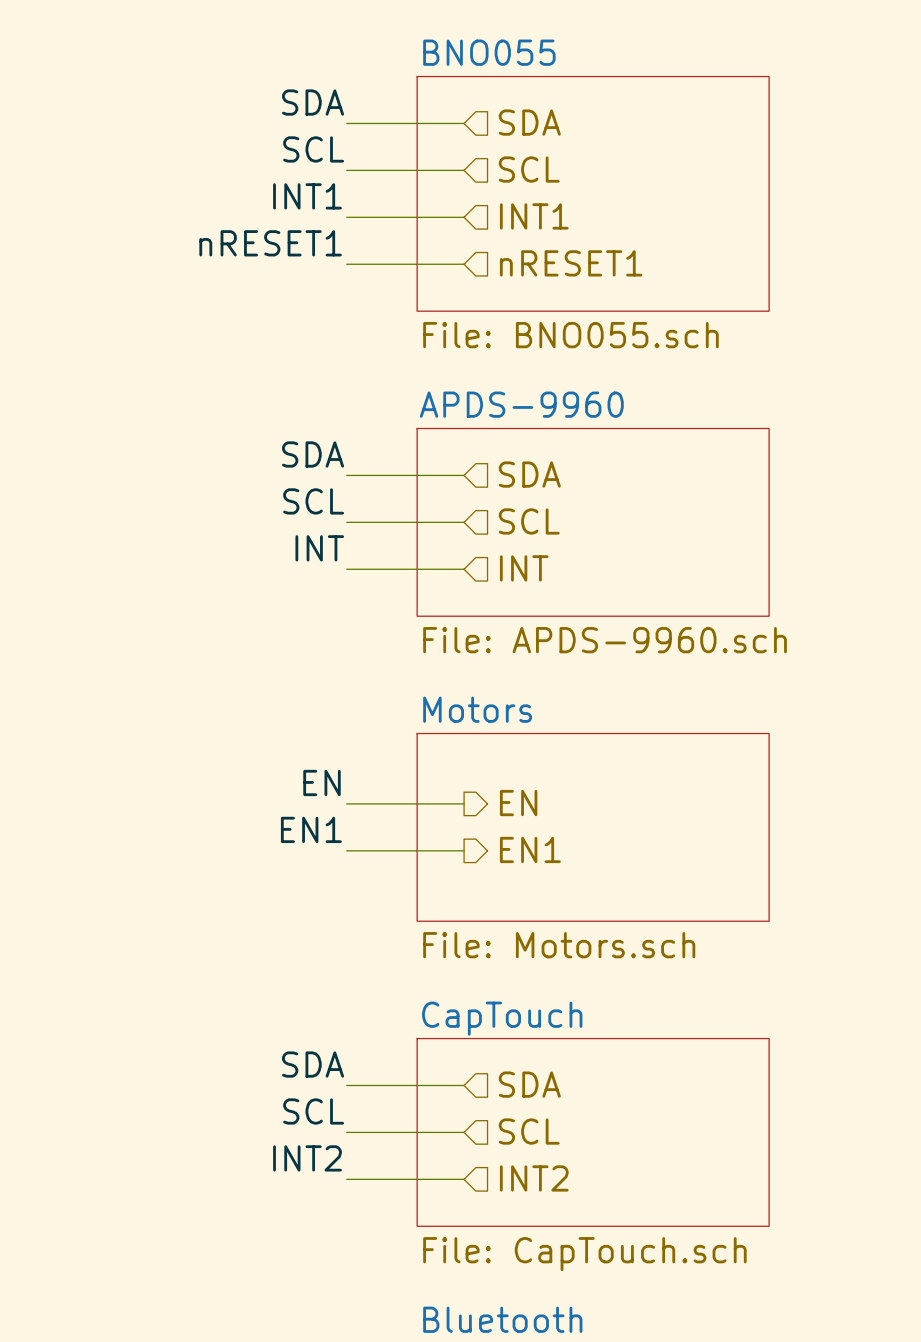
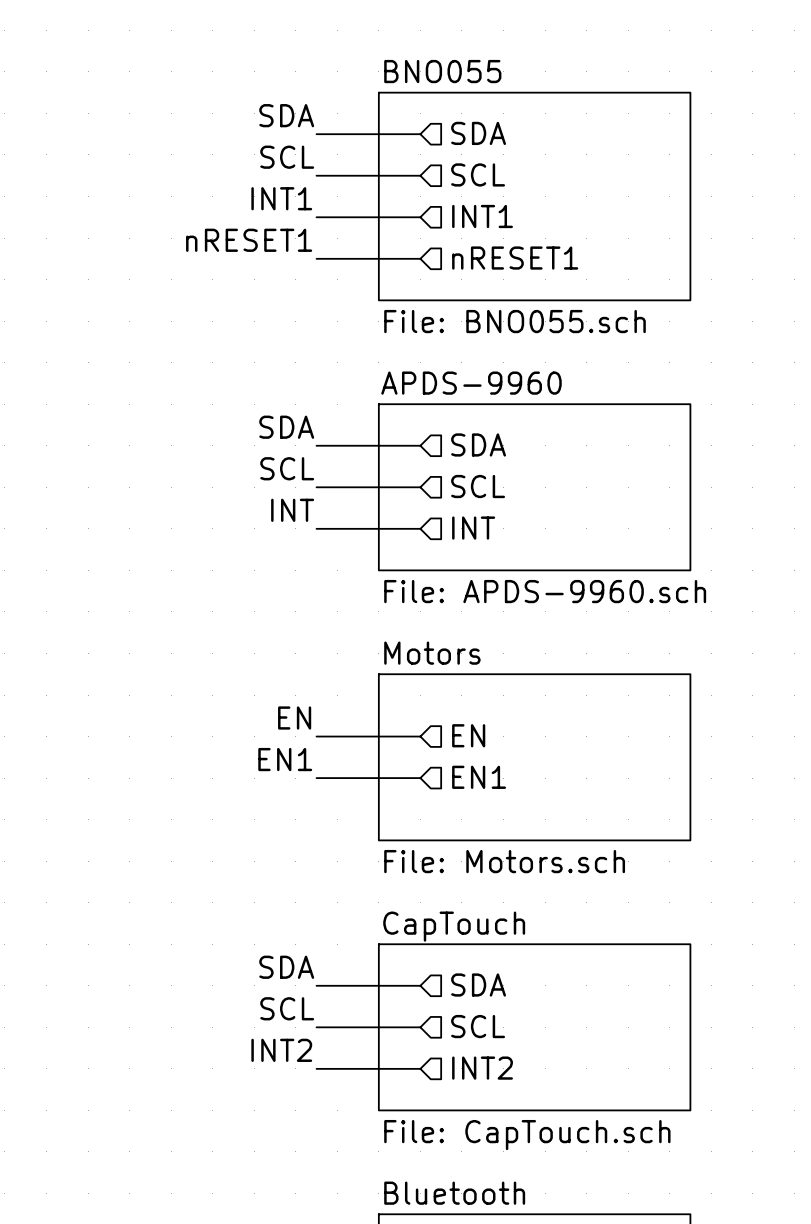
hierarchical label shape: output (518, 803) -> input (468, 735)
hierarchical label shape: output (530, 849) -> input (479, 777)

